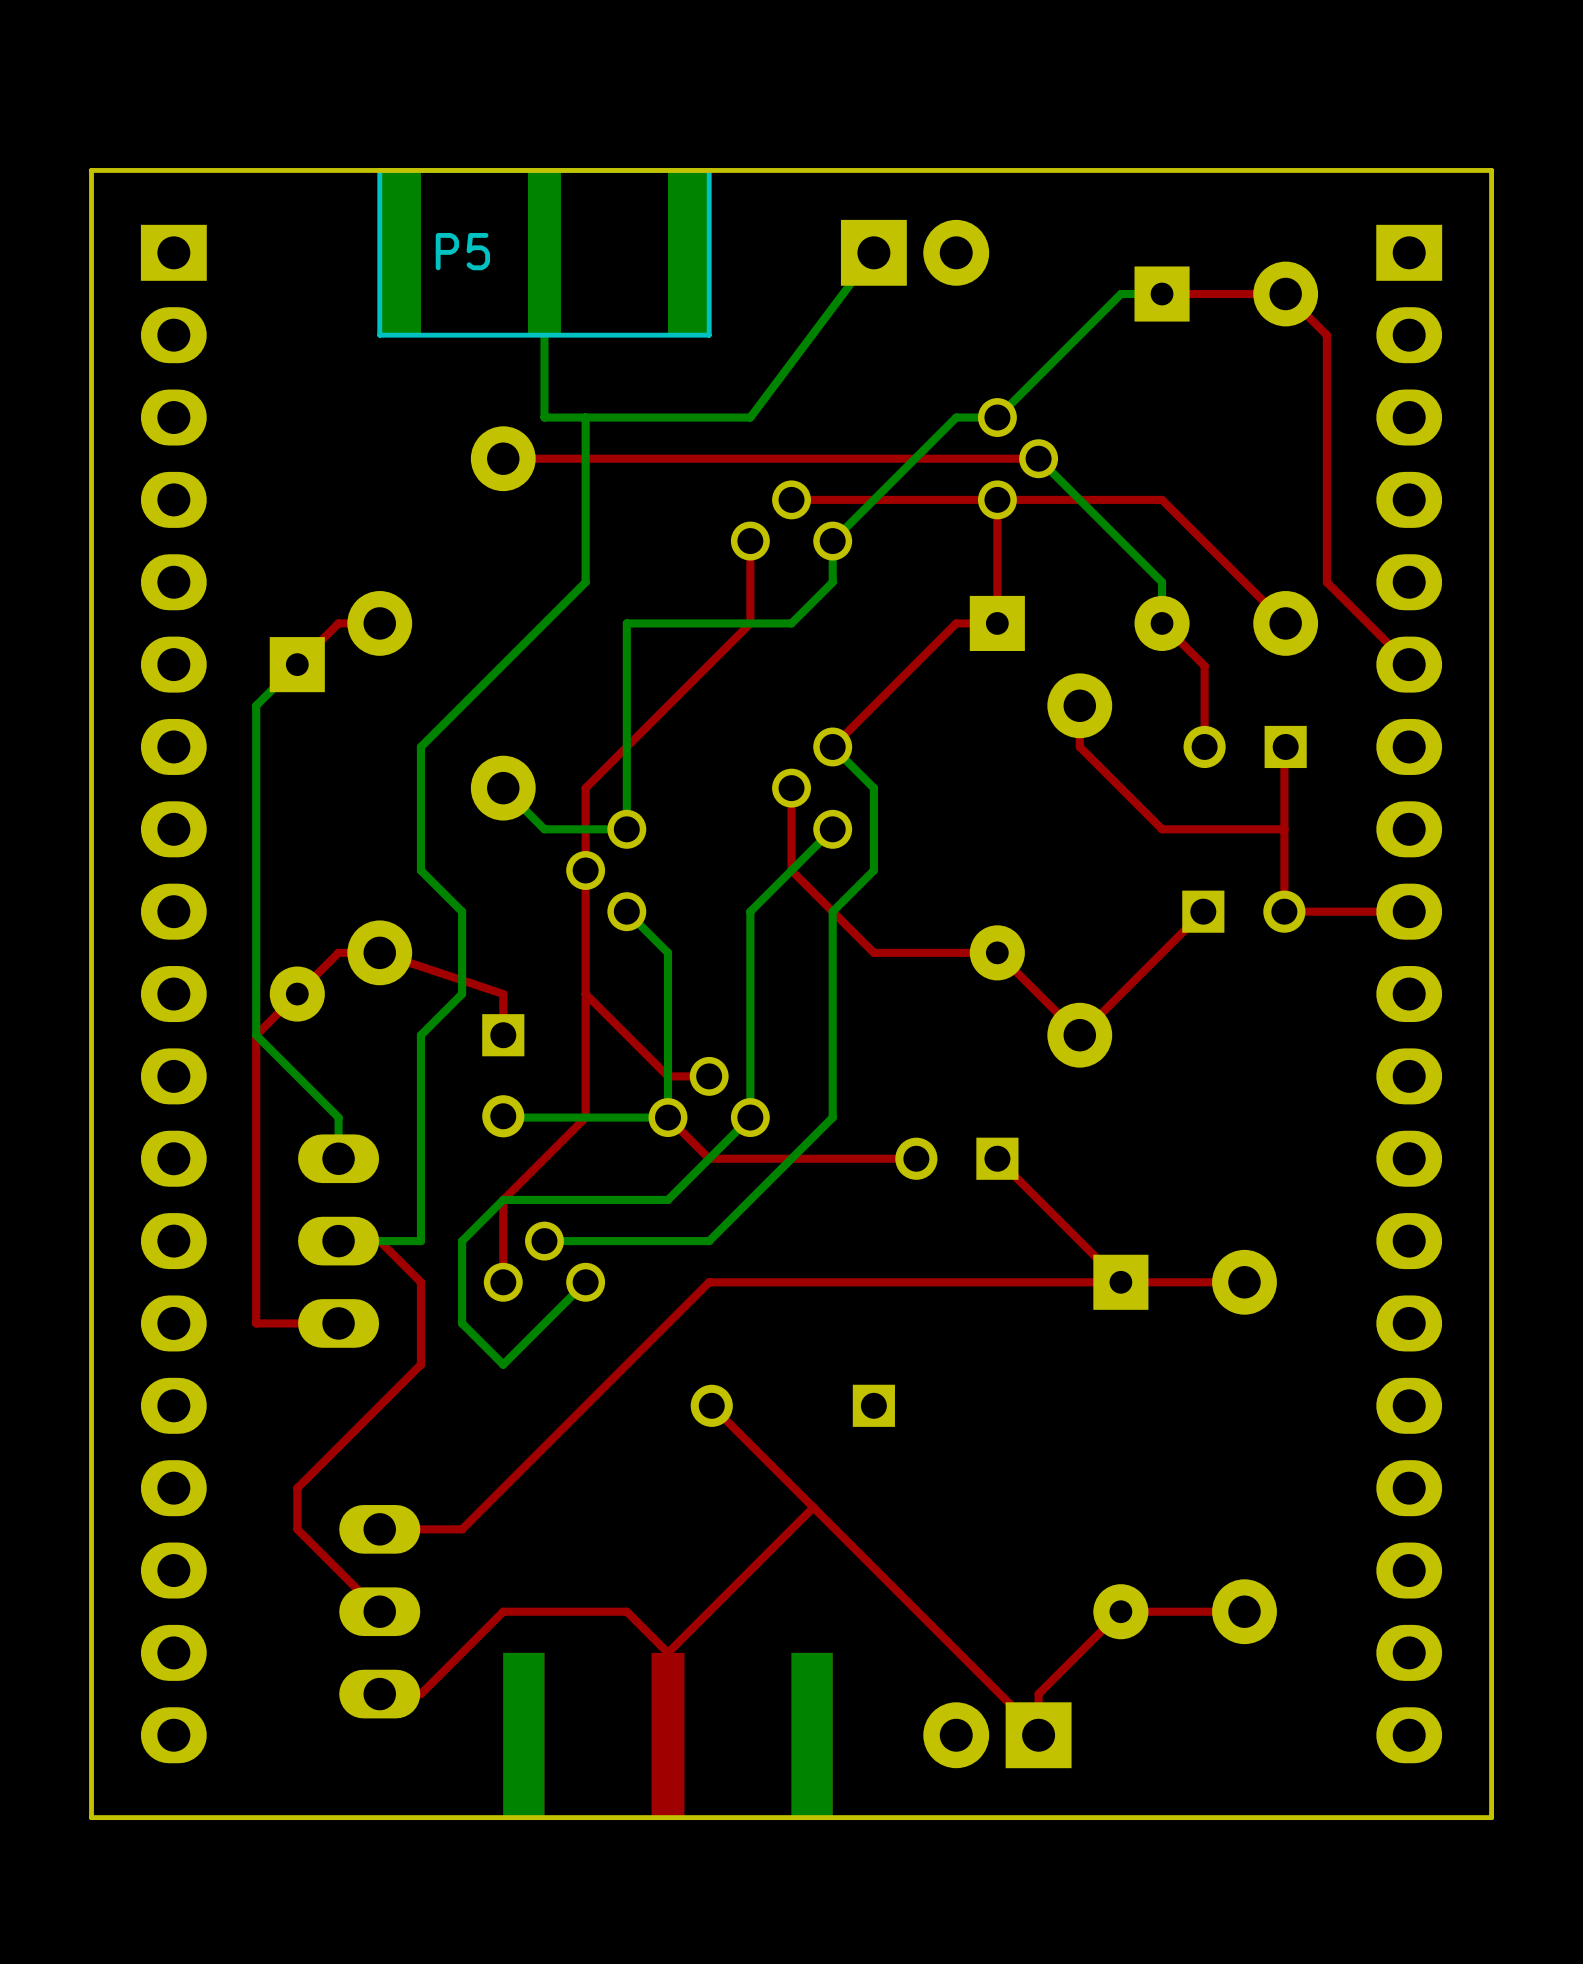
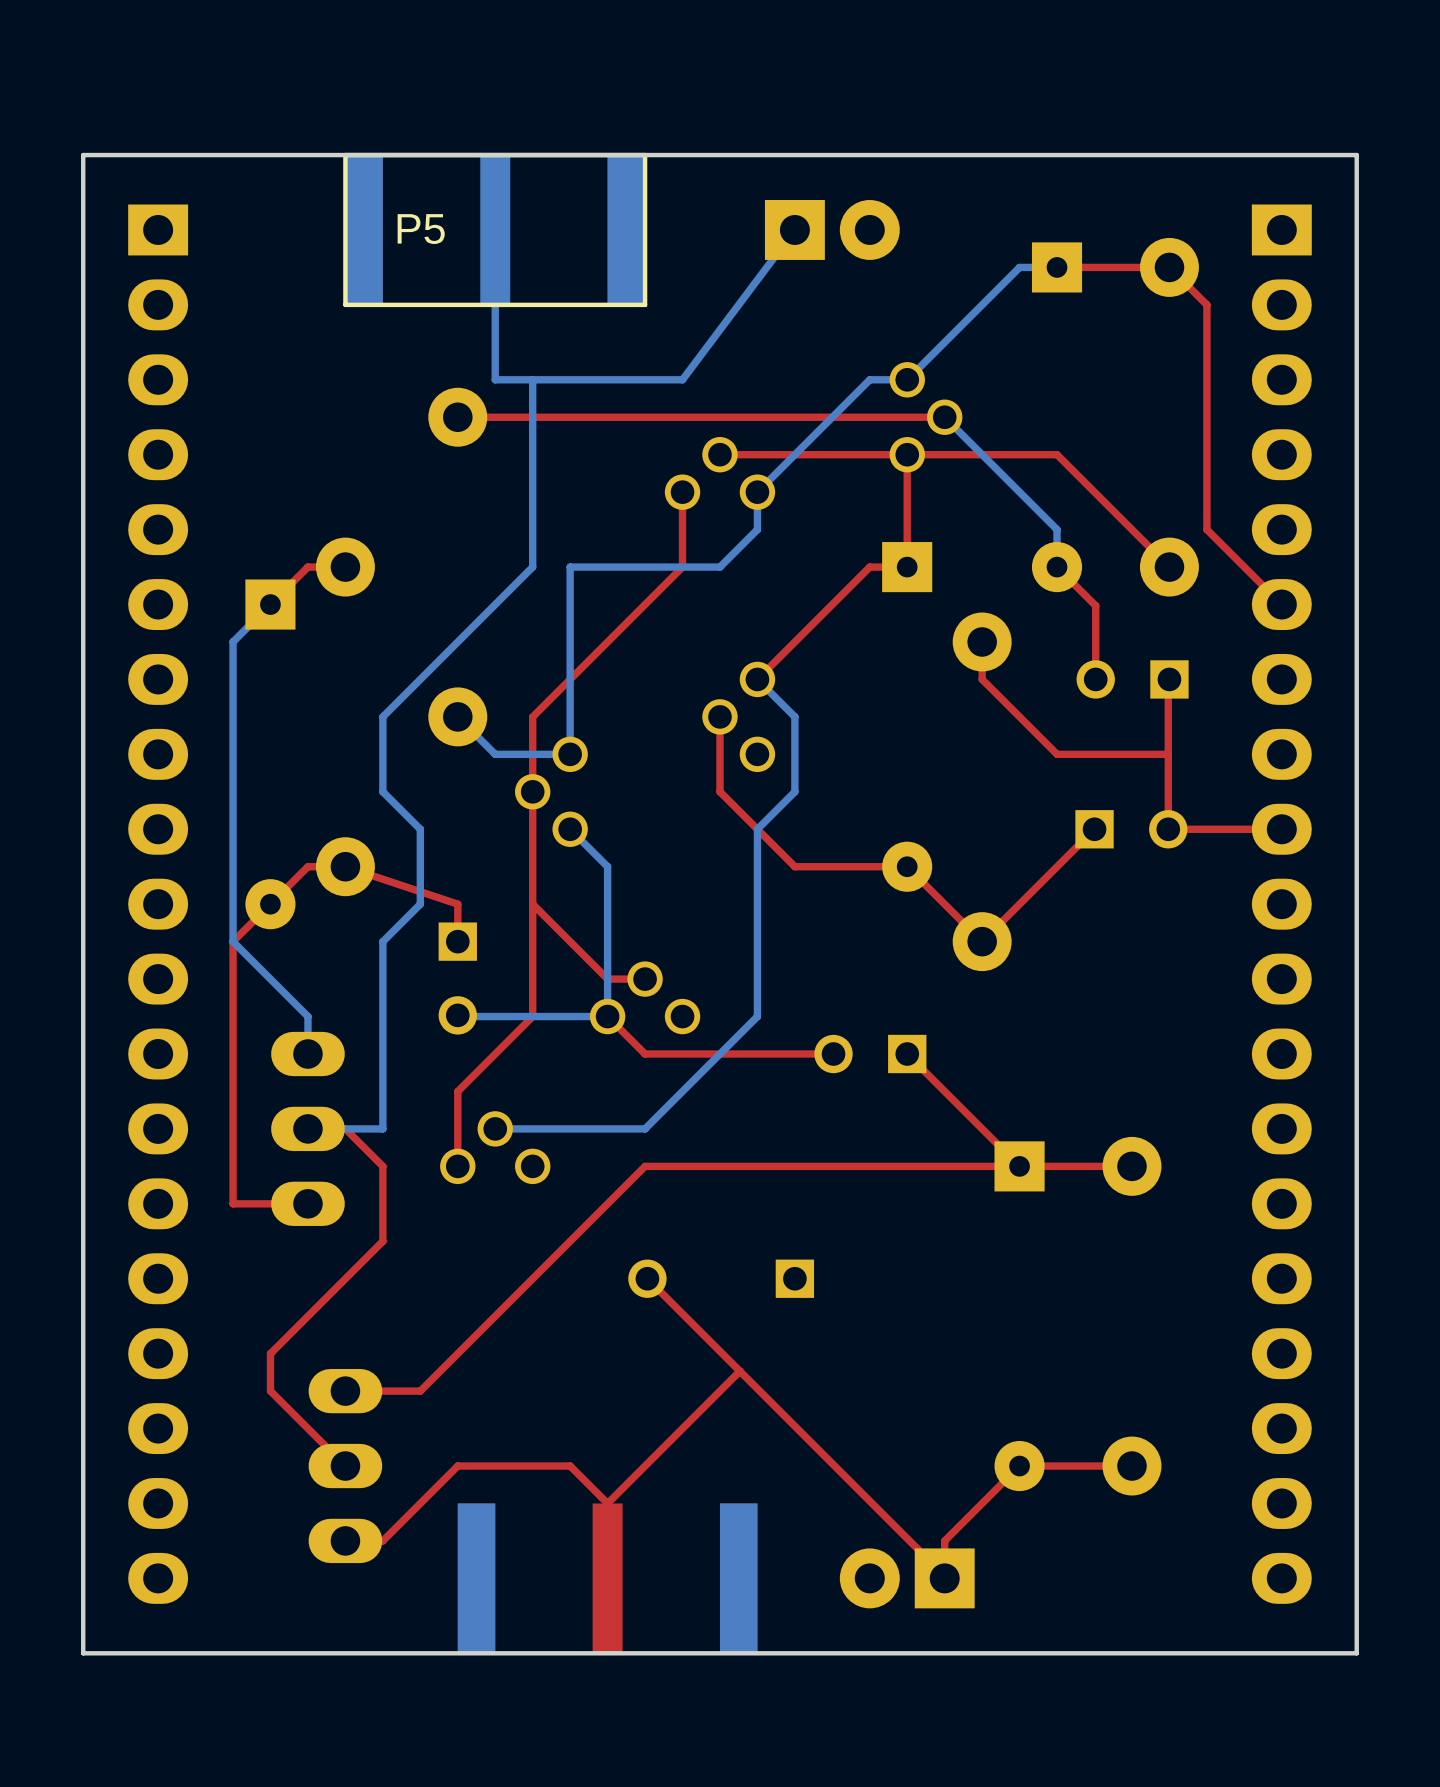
bottom track: (585, 582) (420, 746) (420, 788) -> (532, 529) (532, 567) (382, 716)
bottom track: (832, 829) (750, 911) (750, 1117) (667, 1199) (503, 1199) (462, 1241) (462, 1323) (503, 1364) (585, 1282) -> none

